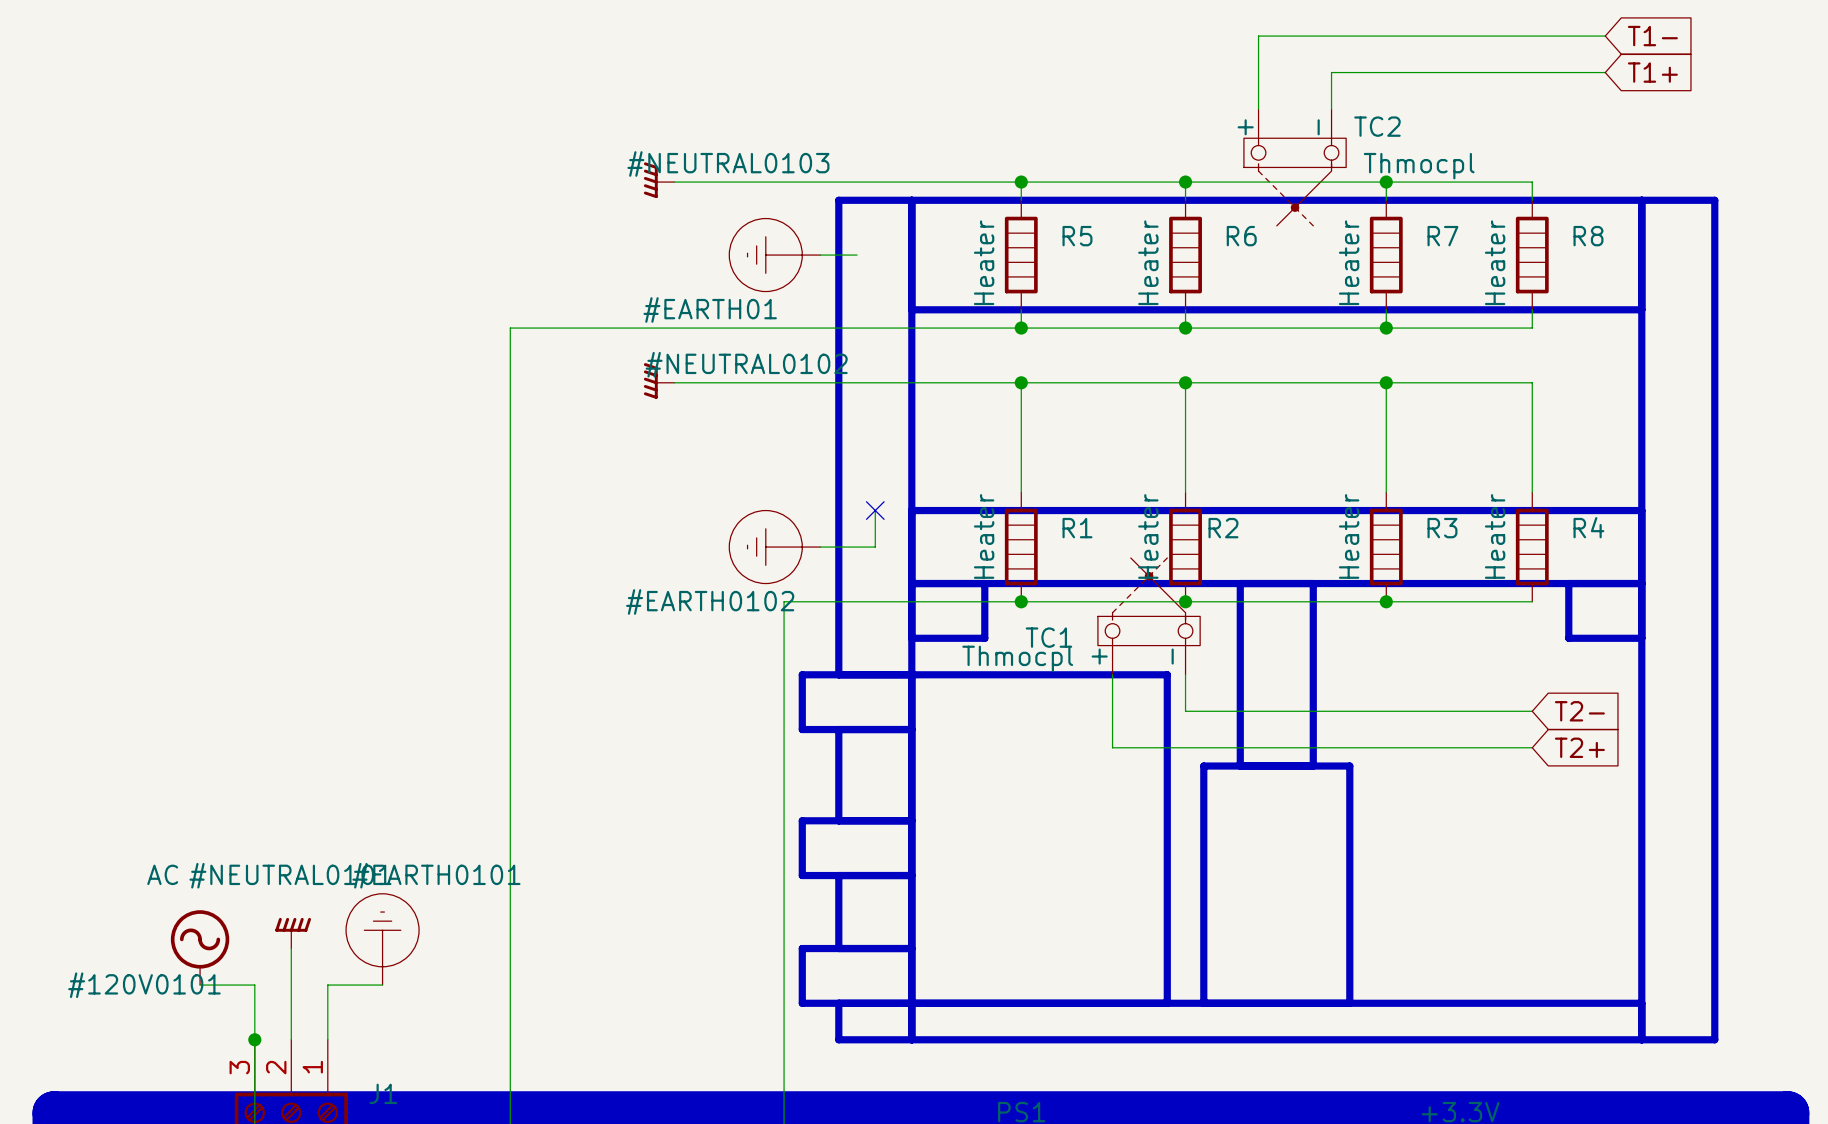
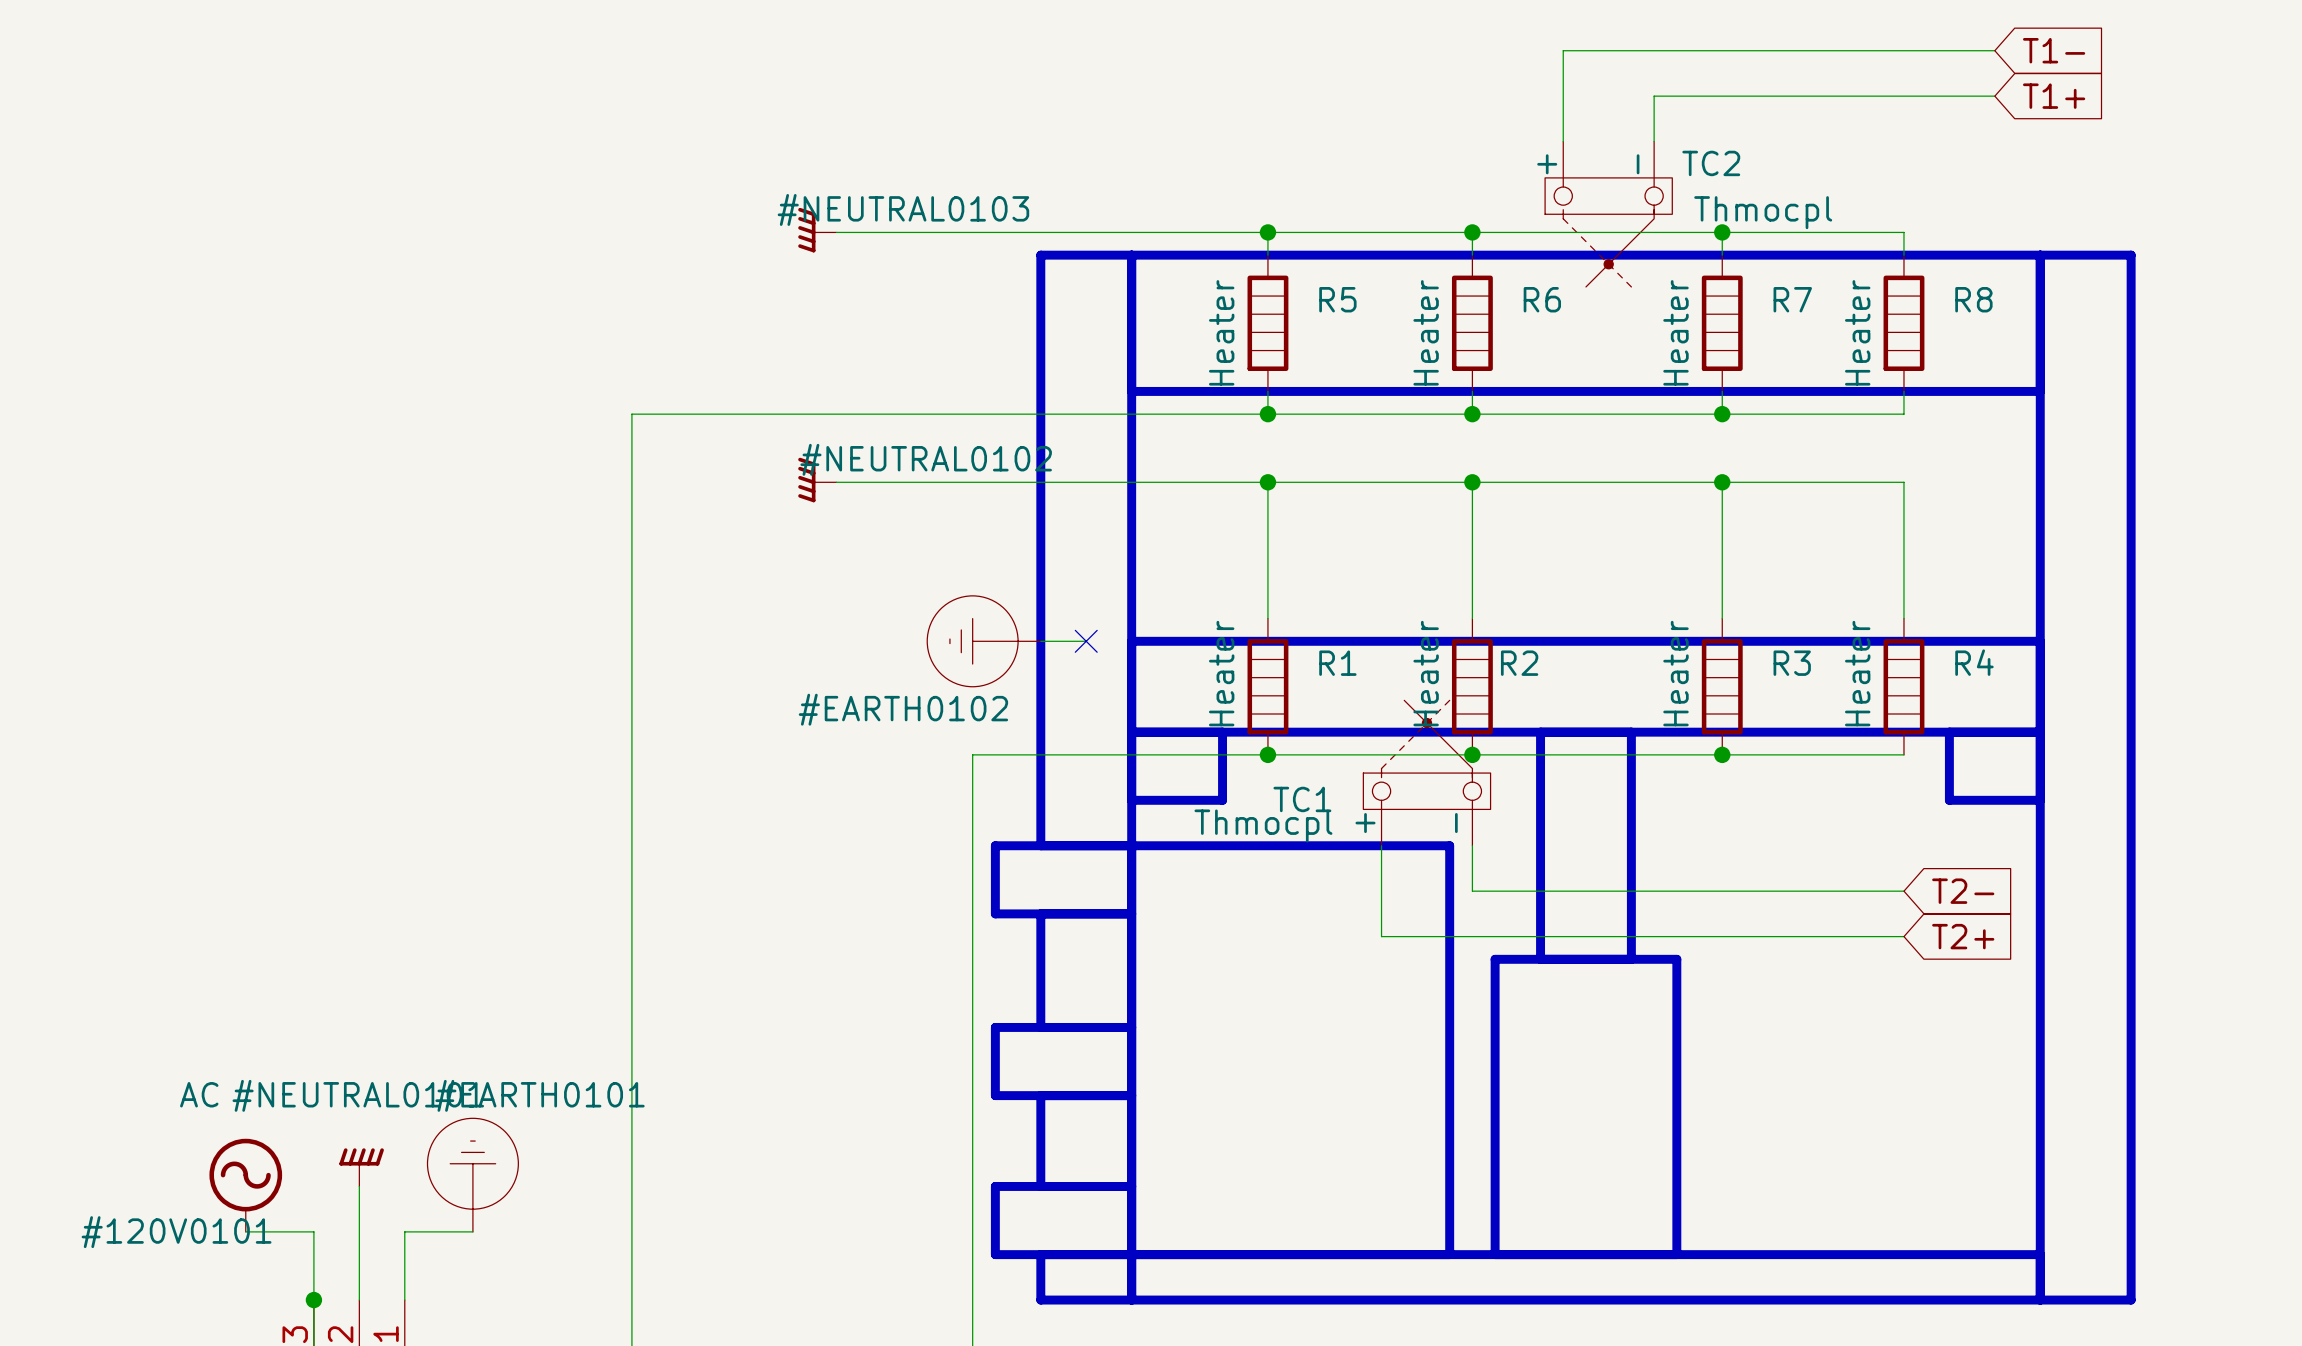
#EARTH01: (774, 255) -> none
wire: (820, 255) (857, 255) -> none
wire: (875, 510) (875, 547) (820, 547) -> (1086, 641) (1040, 641)
#EARTH0102 position: (774, 547) -> (984, 641)

